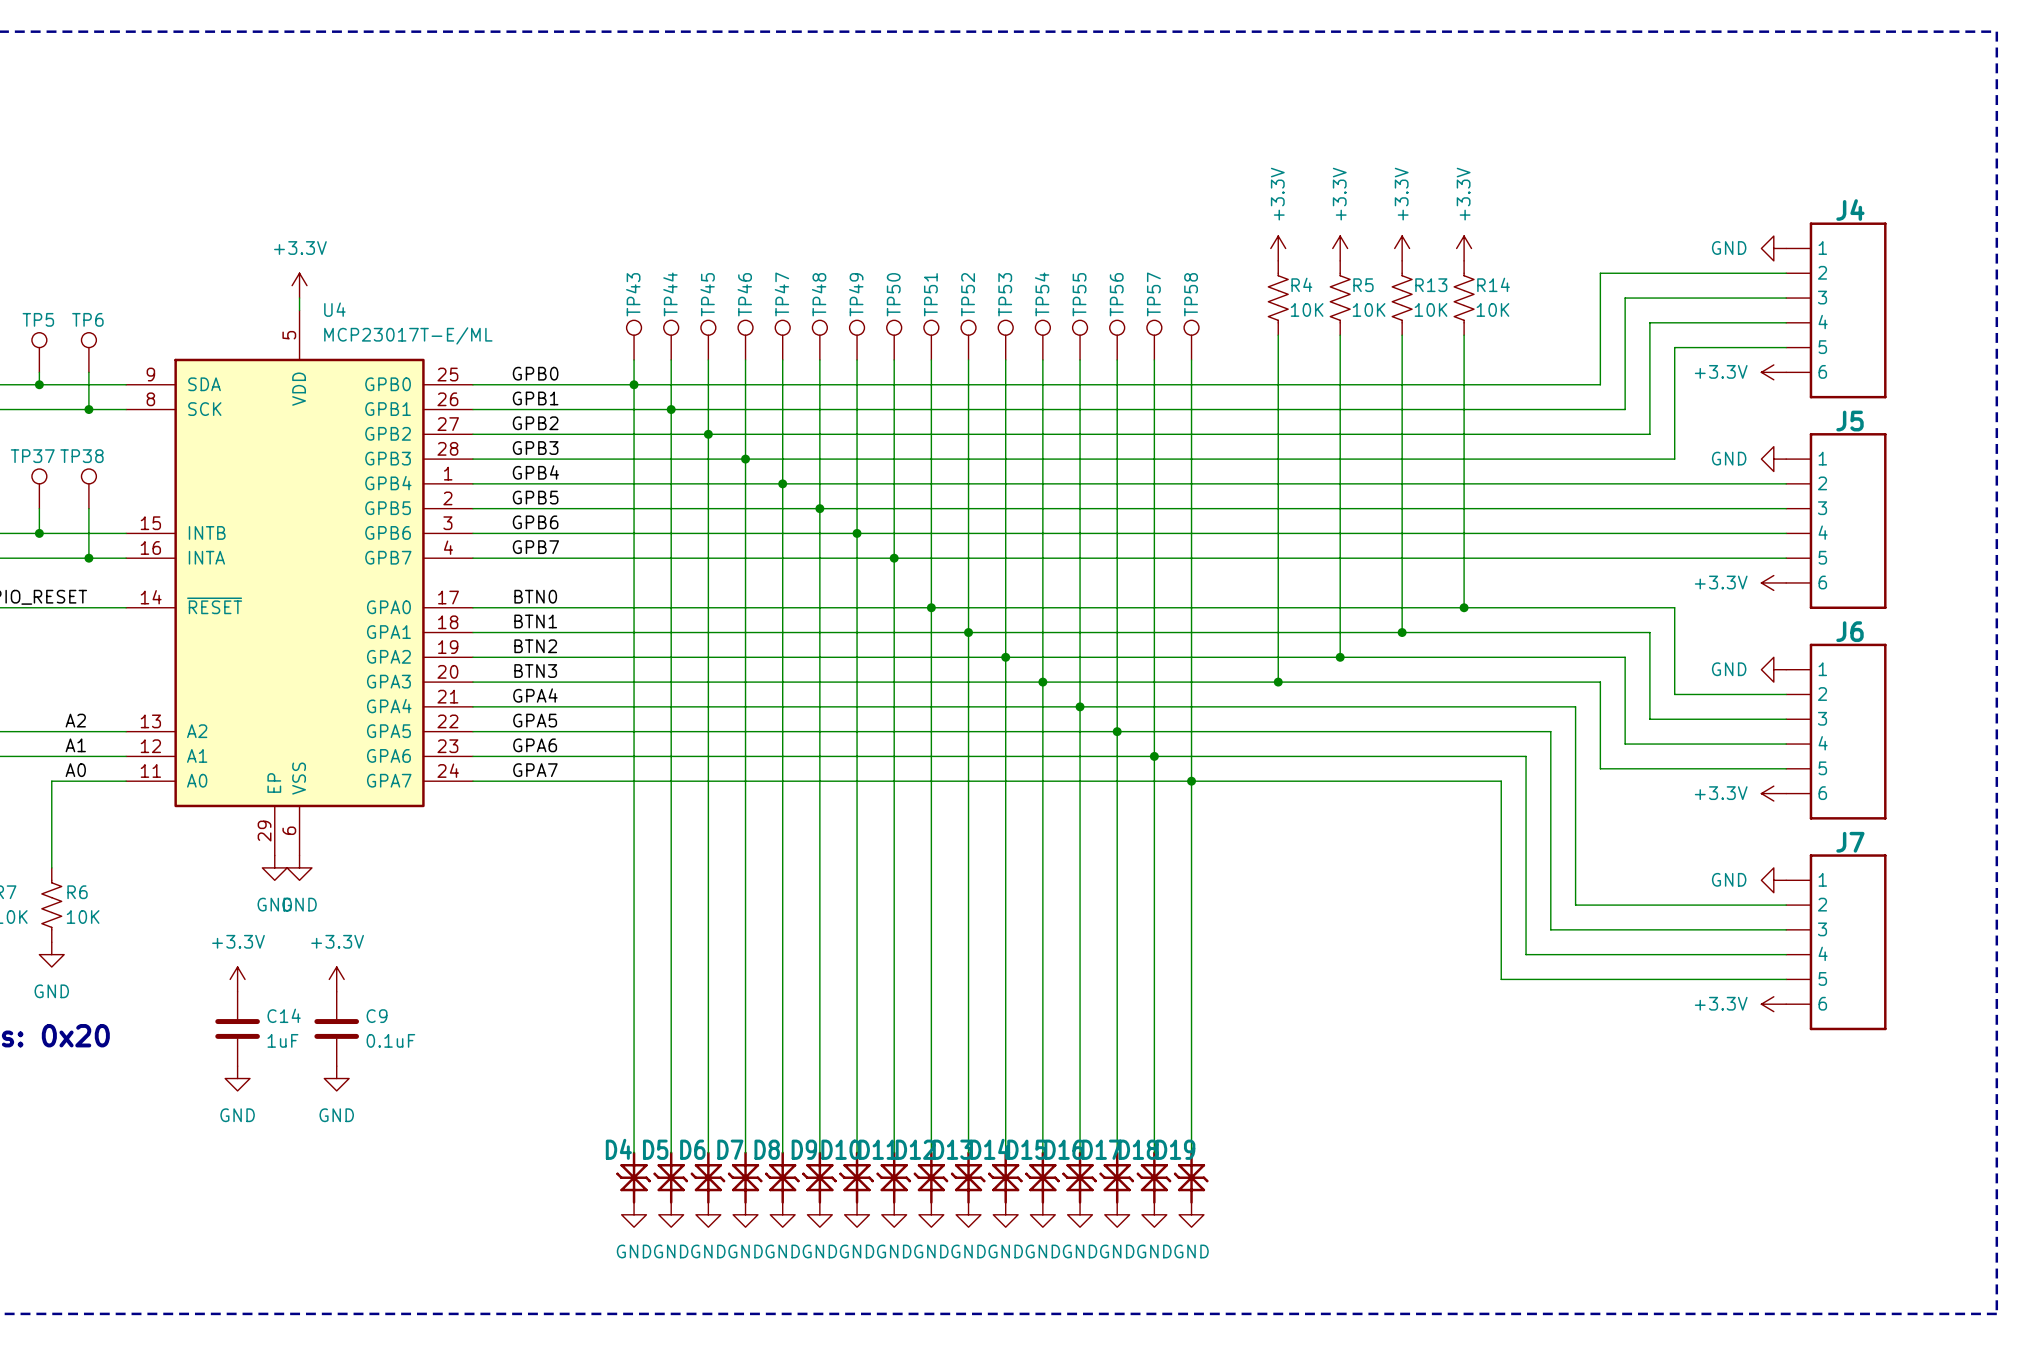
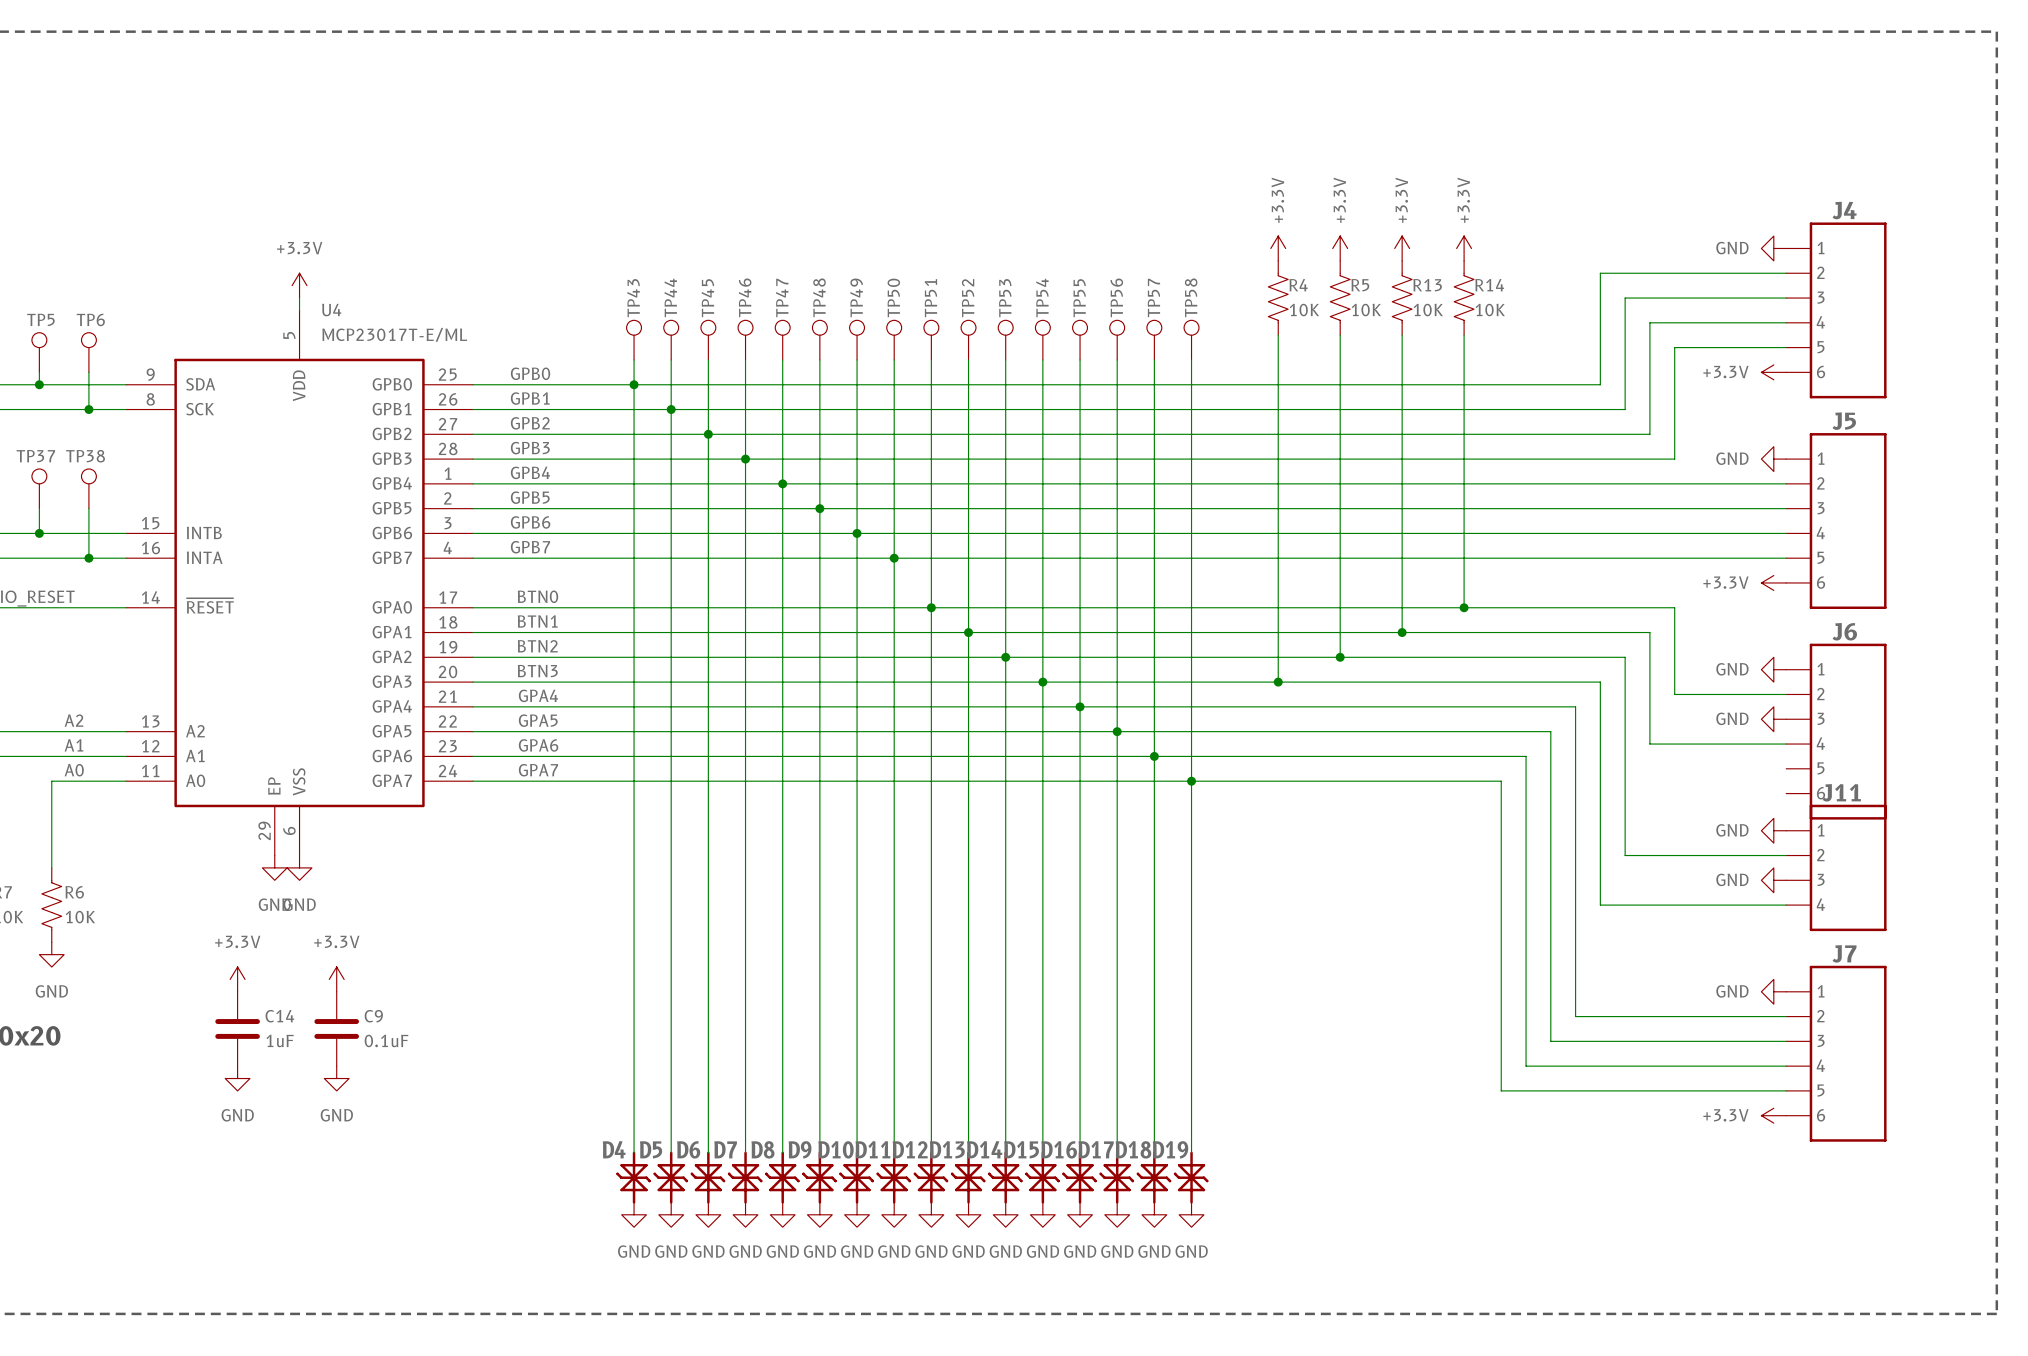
wire: (1649, 719) (1786, 719) -> none
power symbol: none -> GND (1773, 719)
wire: (1625, 744) (1649, 744) -> (1649, 719) (1649, 744)
wire: none -> (1625, 744) (1625, 855) (1786, 855)
wire: (1600, 768) (1786, 768) -> none
power symbol: +3.3V (1773, 793) -> none
power symbol: none -> GND (1773, 830)
J11: none -> (1836, 867)
wire: (1575, 905) (1600, 905) -> (1600, 768) (1600, 905)
wire: none -> (1575, 905) (1575, 1016) (1786, 1016)
wire: (1550, 929) (1786, 929) -> (1550, 929) (1550, 1041) (1786, 1041)
J7 position: (1836, 942) -> (1836, 1053)
wire: (1526, 954) (1786, 954) -> (1526, 954) (1526, 1066) (1786, 1066)
wire: (1501, 979) (1786, 979) -> (1501, 979) (1501, 1090) (1786, 1090)
power symbol: none -> GND (1773, 991)
power symbol position: +3.3V (1773, 1004) -> +3.3V (1773, 1115)

